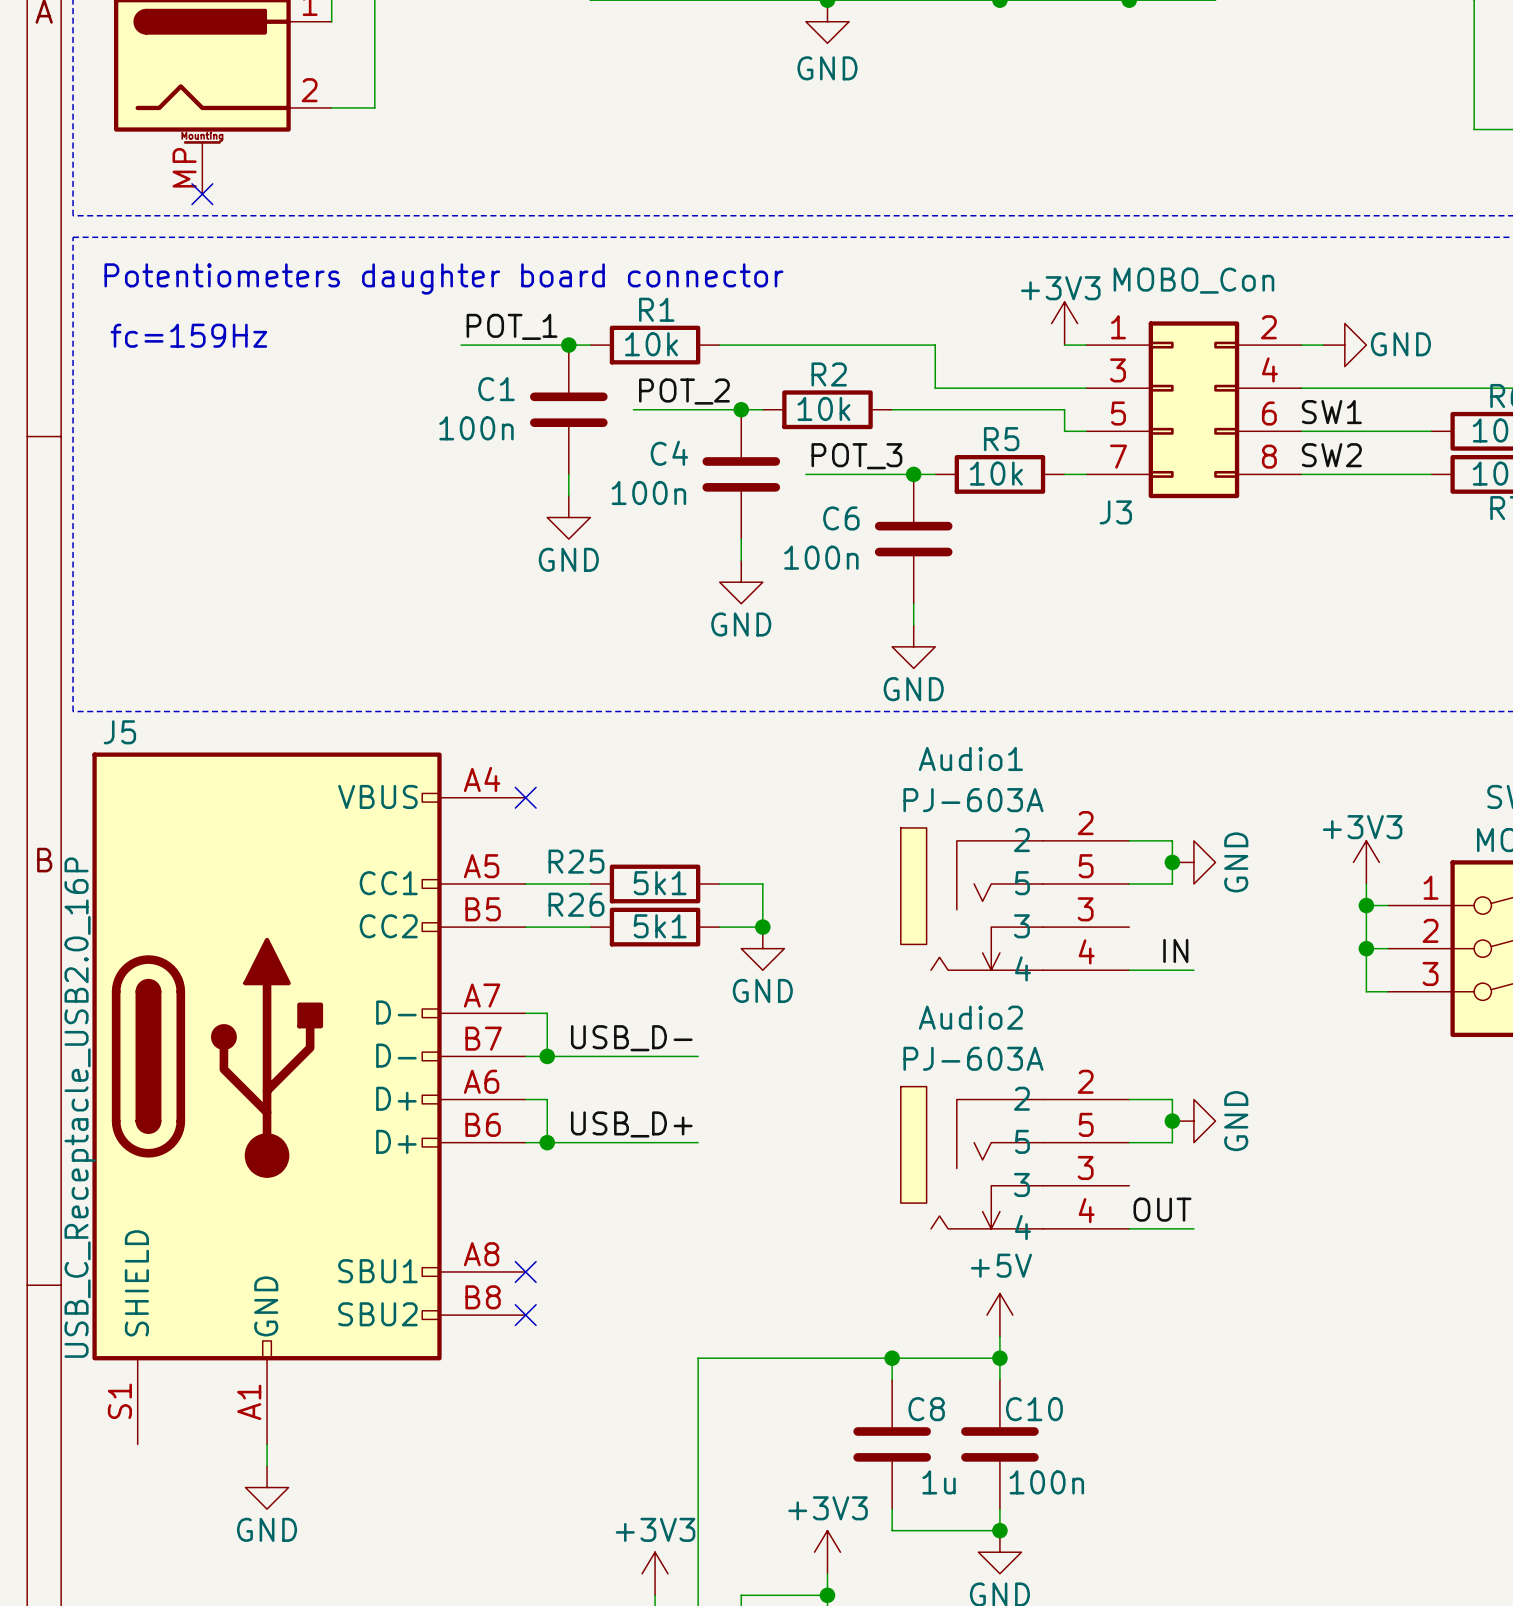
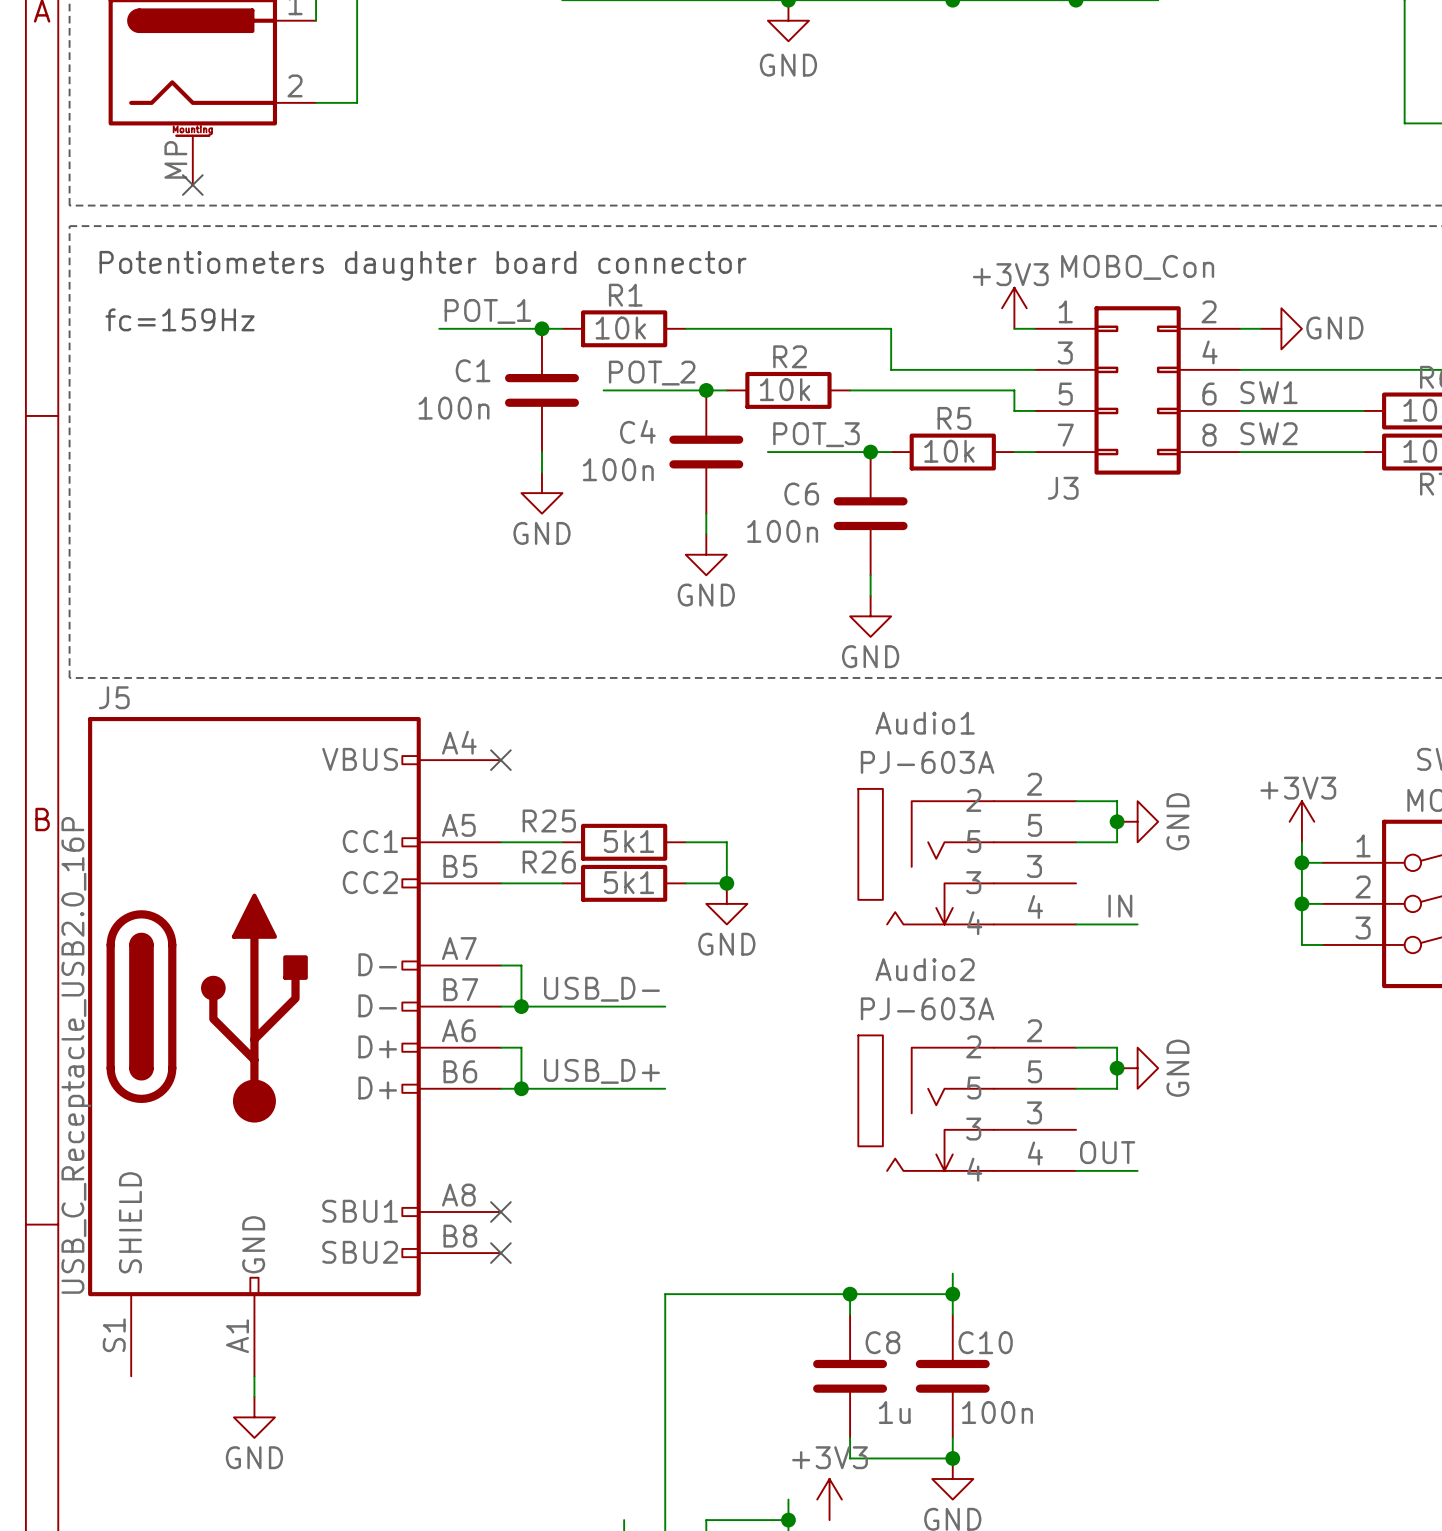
power symbol: +5V (999, 1315) -> none
power symbol position: +3V3 (827, 1552) -> +3V3 (829, 1499)
power symbol: +3V3 (655, 1573) -> none

